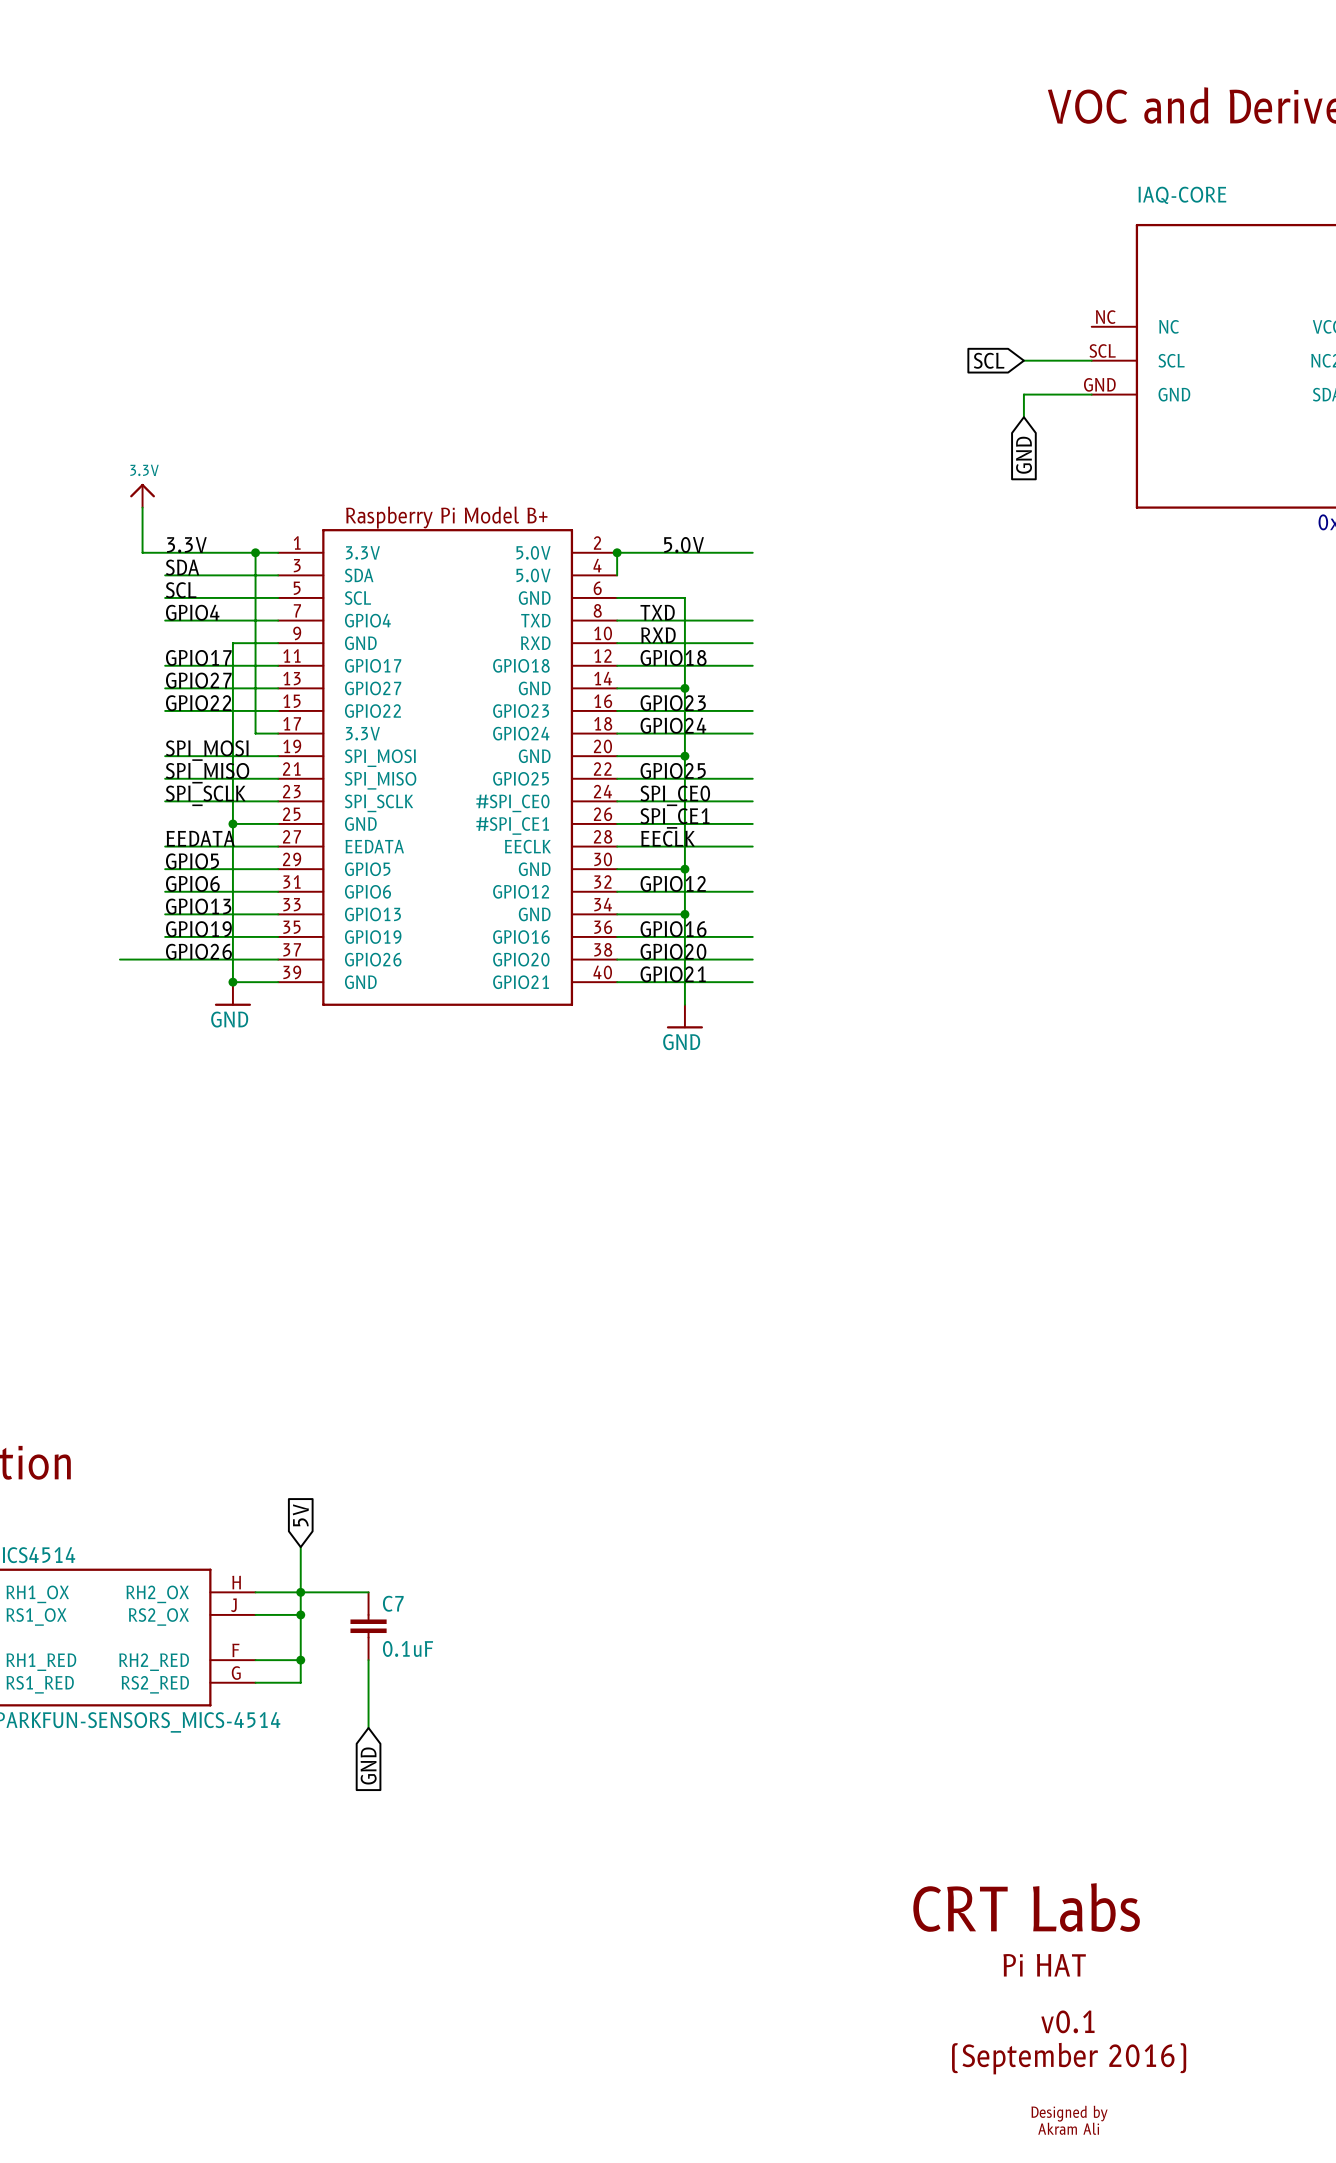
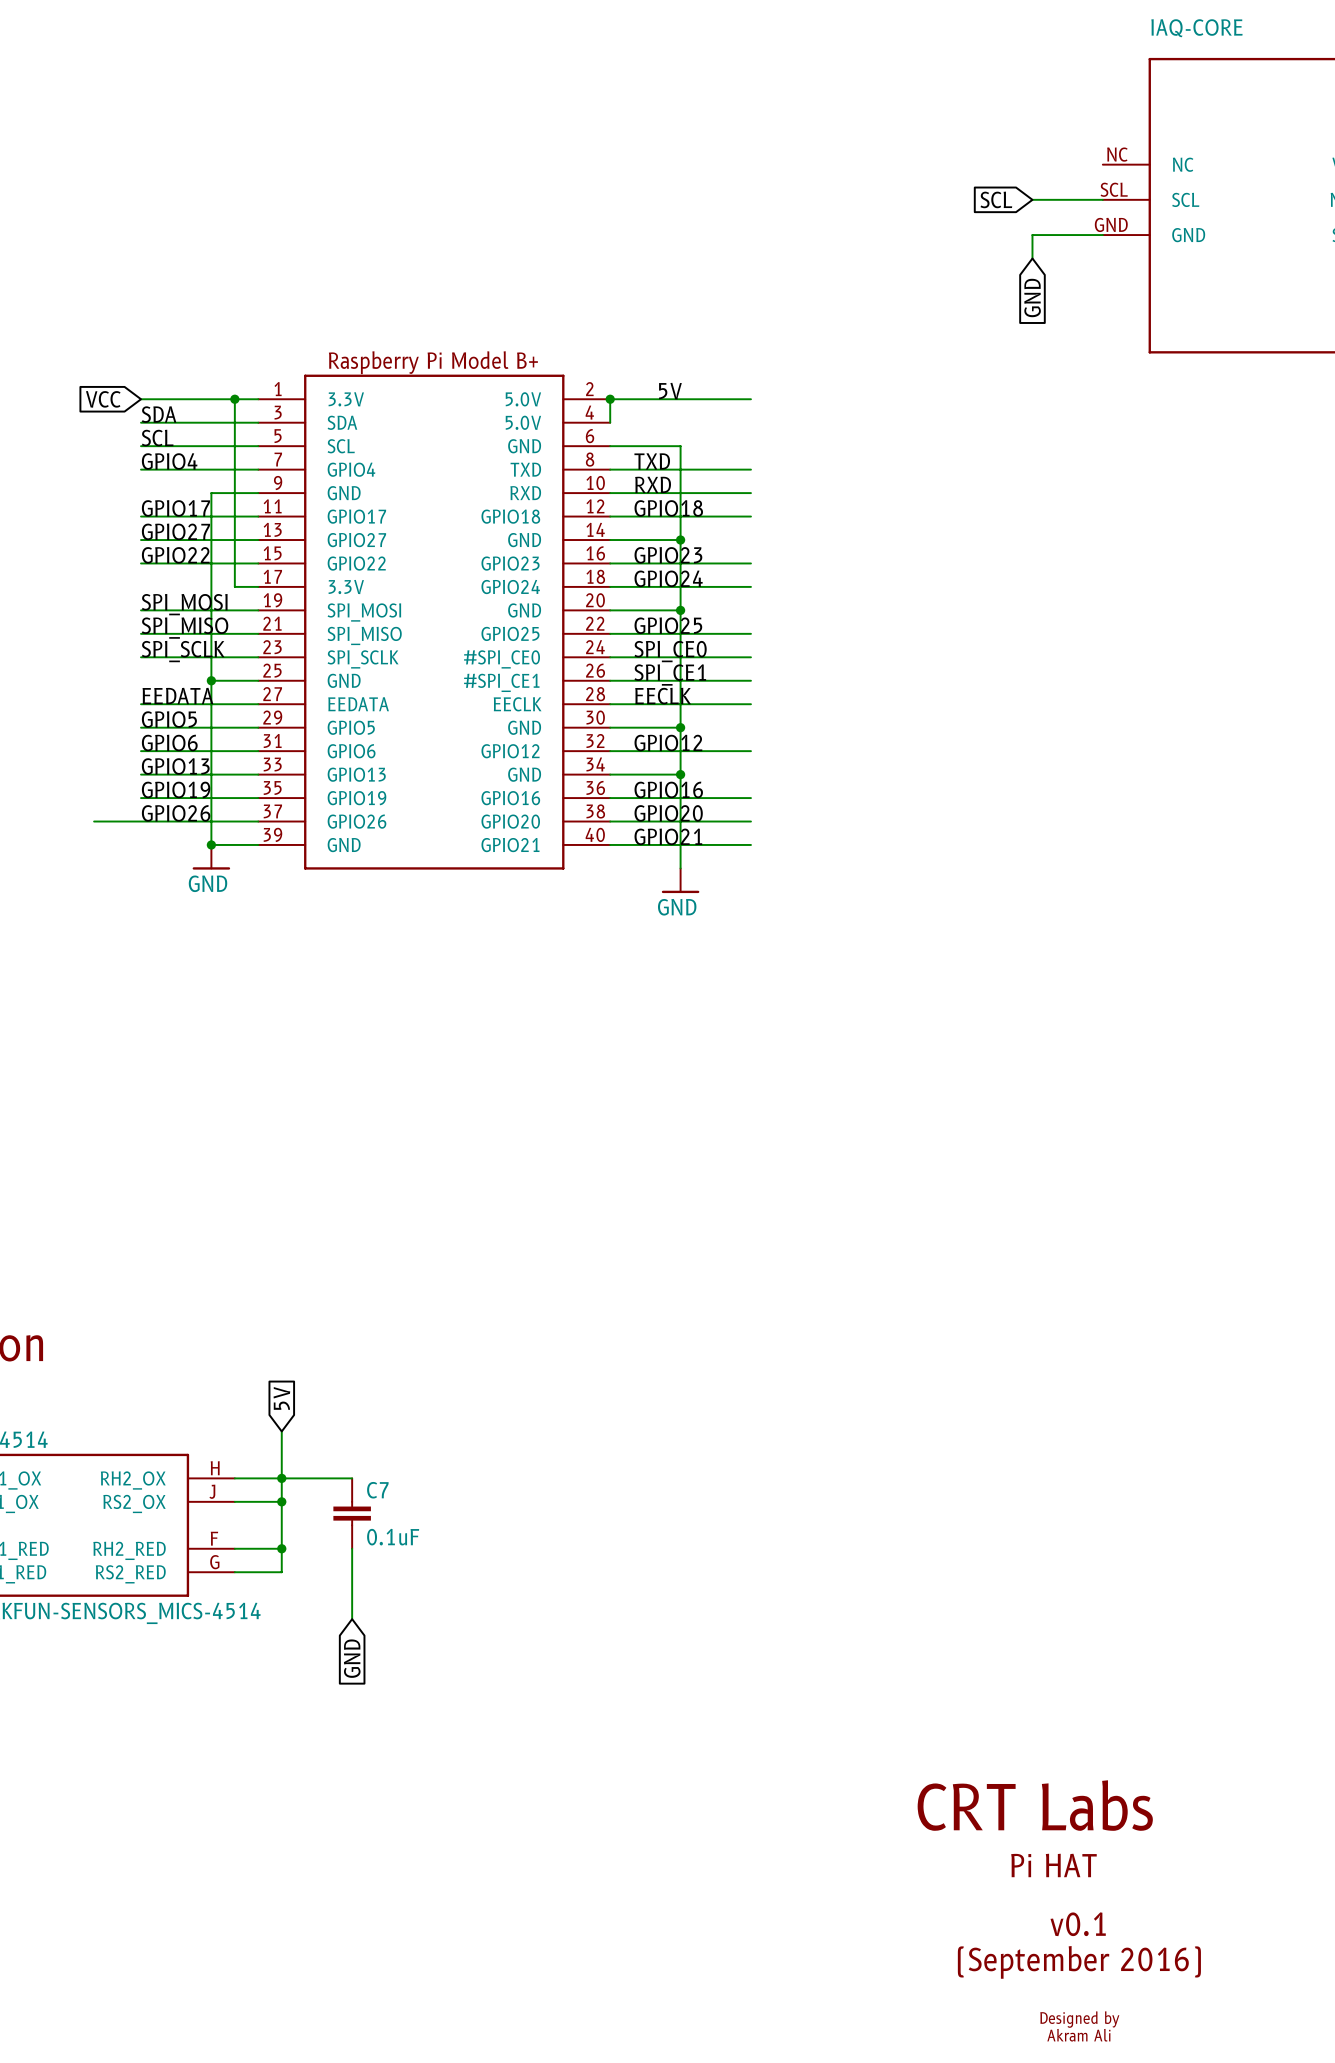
power symbol: 3.3V (142, 495) -> none
wire: (142, 507) (142, 552) (165, 552) -> none
label: 3.3V (186, 544) -> none
label: 5.0V (684, 544) -> 5V (670, 391)
global label: none -> VCC (103, 399)

